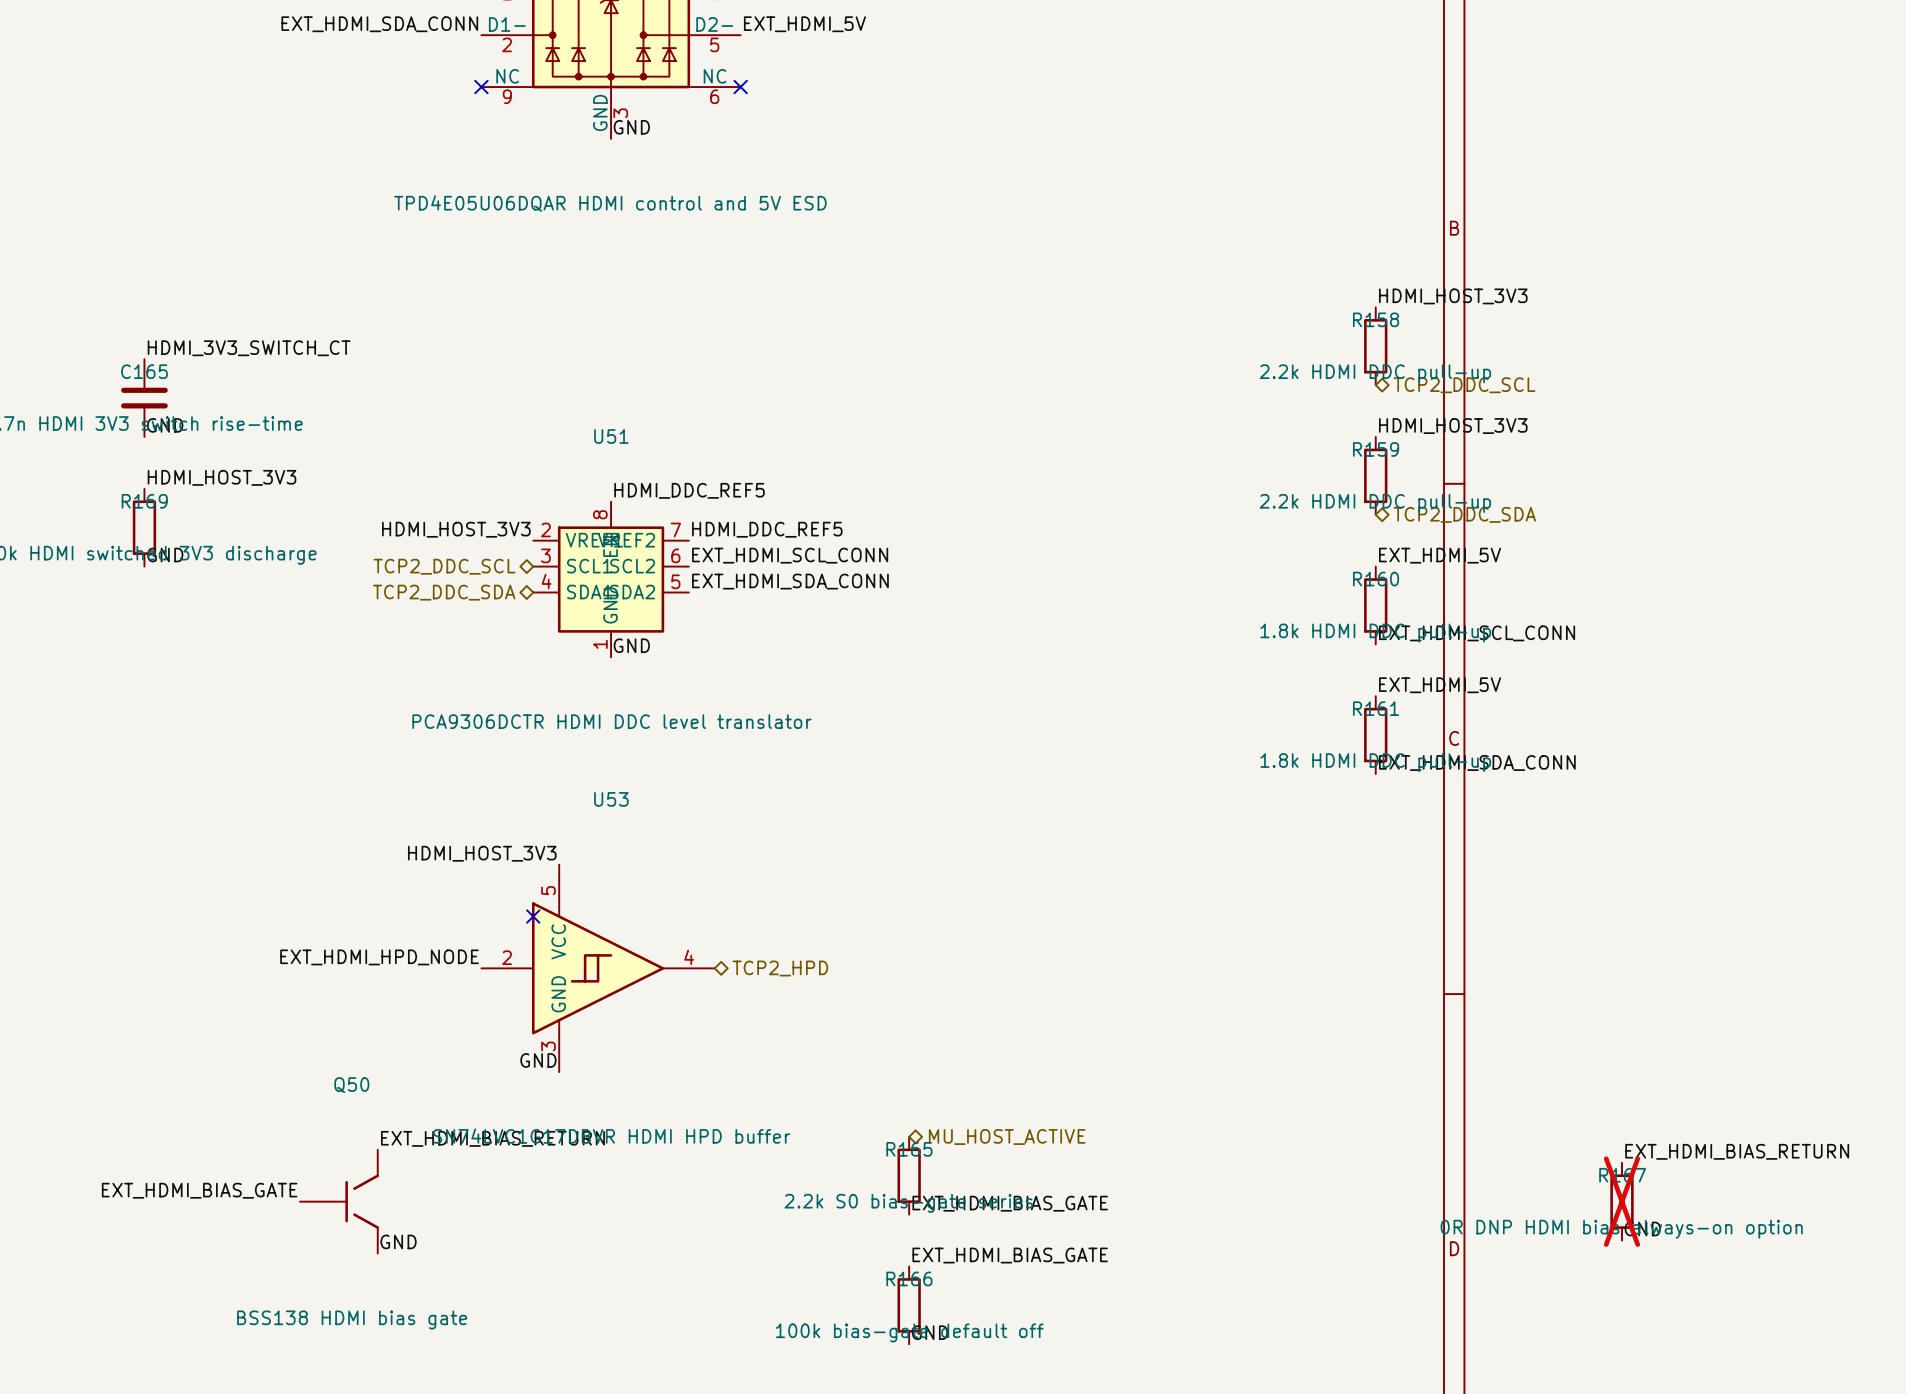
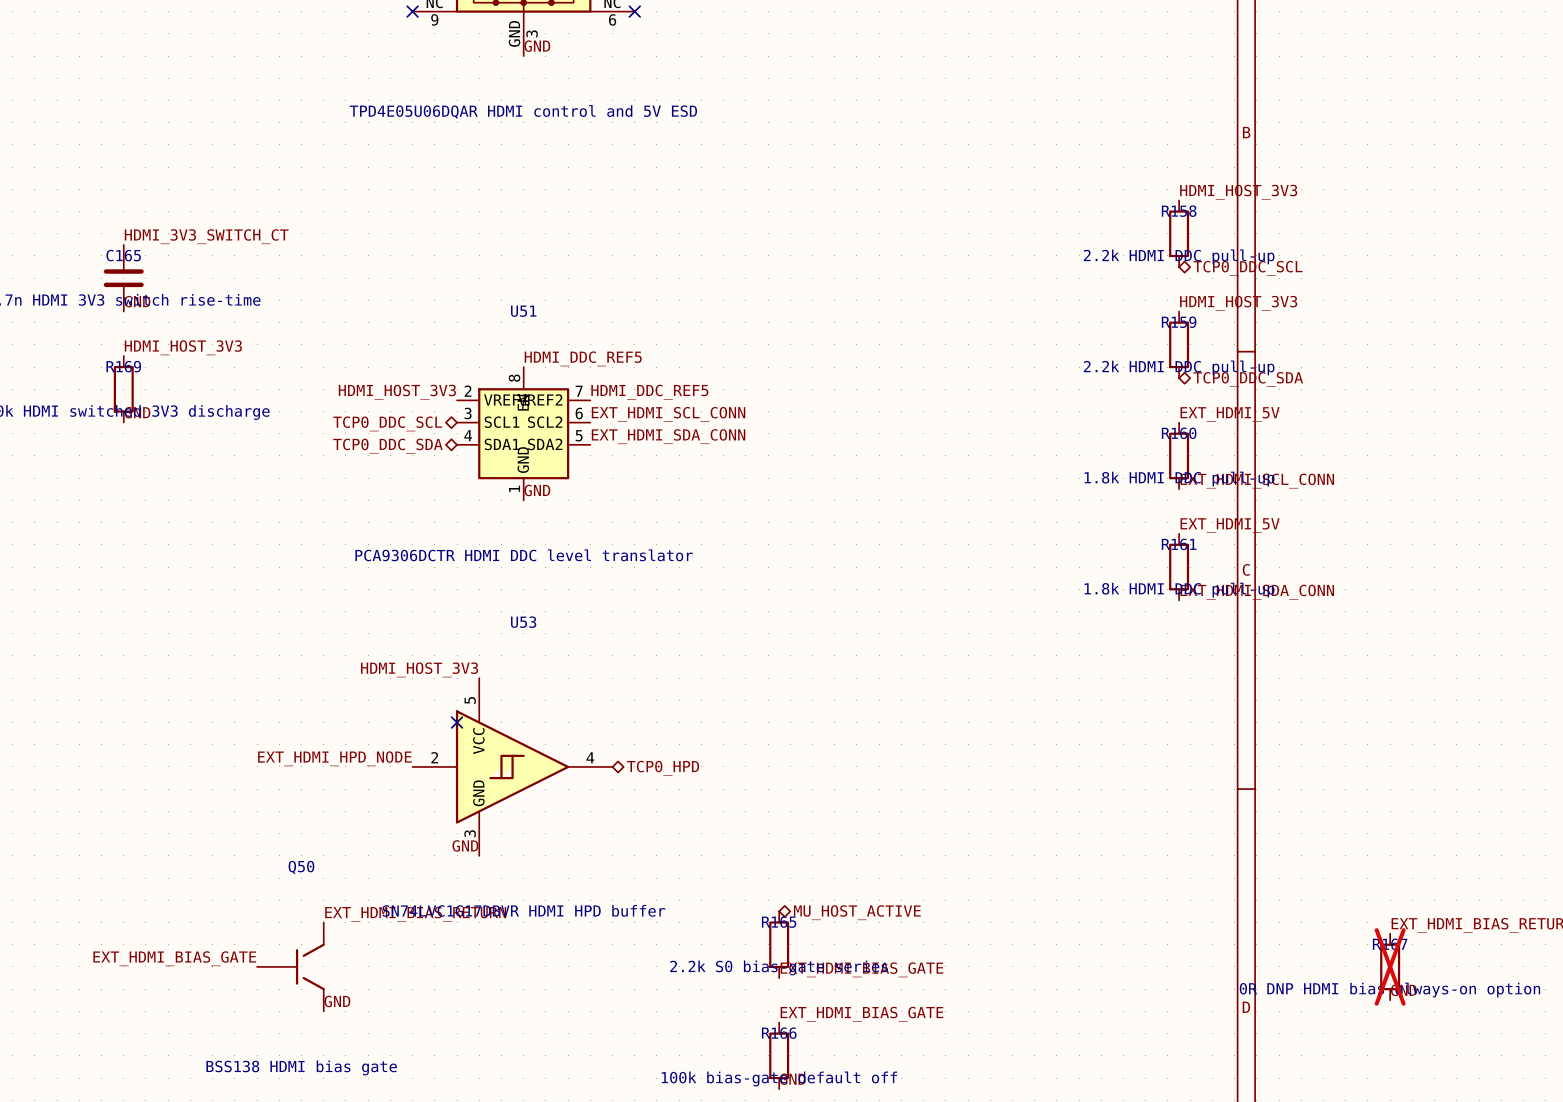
hierarchical label: TCP2_DDC_SCL (1464, 385) -> TCP0_DDC_SCL (1248, 268)
hierarchical label: TCP2_DDC_SDA (1464, 514) -> TCP0_DDC_SDA (1248, 379)
hierarchical label: TCP2_DDC_SCL (444, 566) -> TCP0_DDC_SCL (387, 423)
hierarchical label: TCP2_DDC_SDA (444, 592) -> TCP0_DDC_SDA (387, 446)
hierarchical label: TCP2_HPD (780, 968) -> TCP0_HPD (663, 768)

